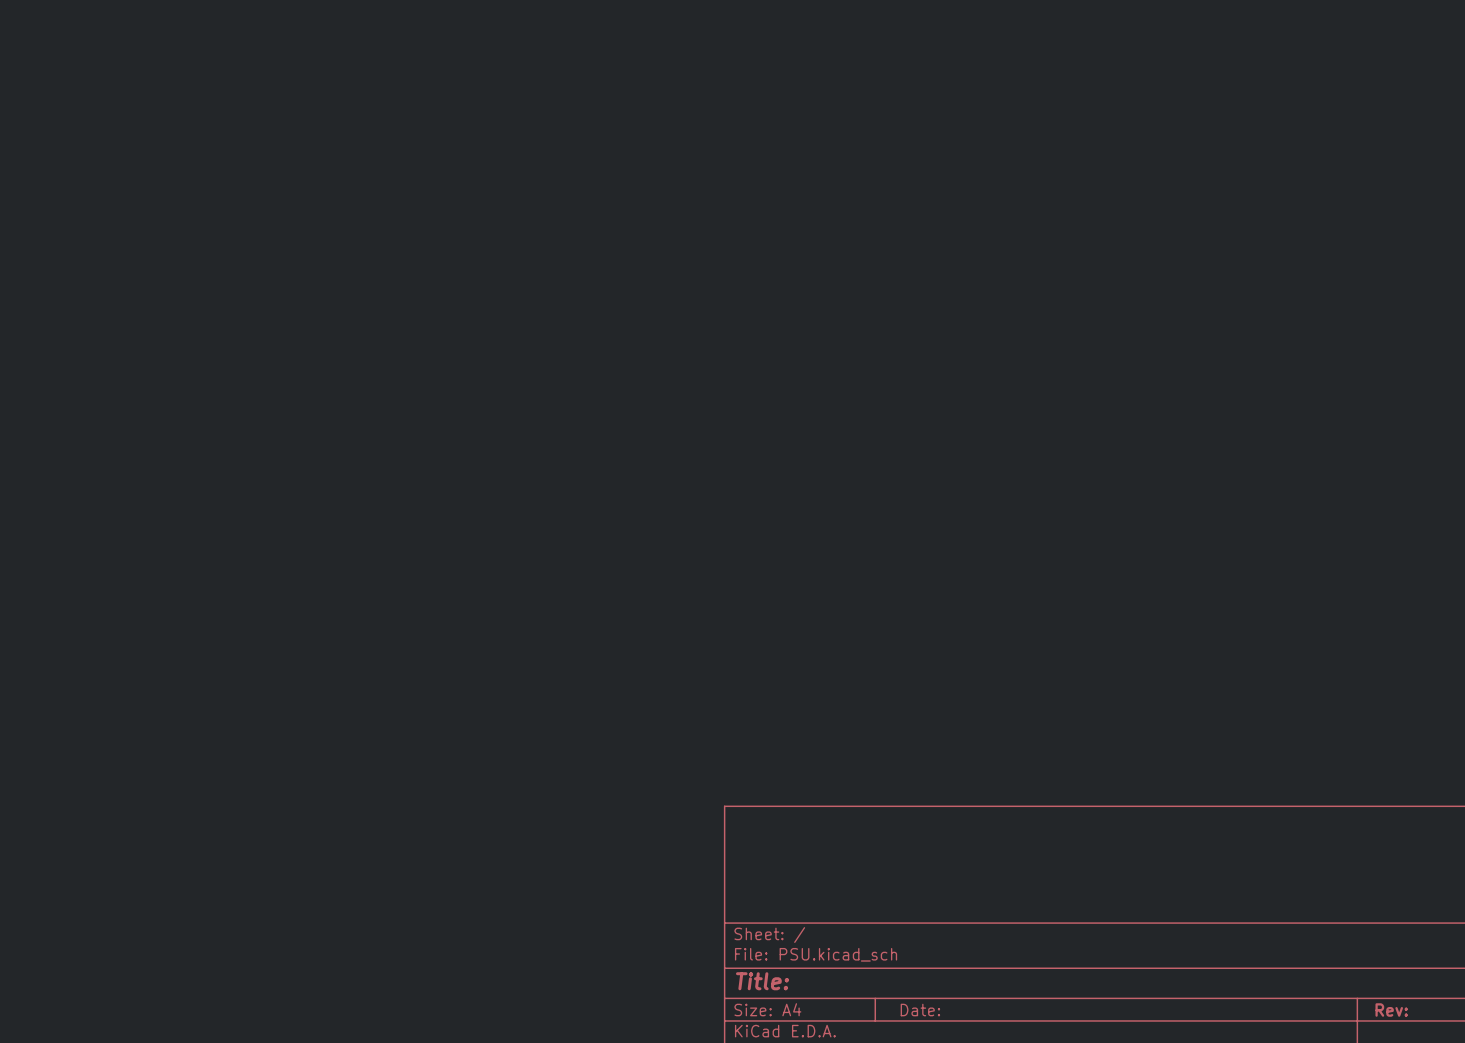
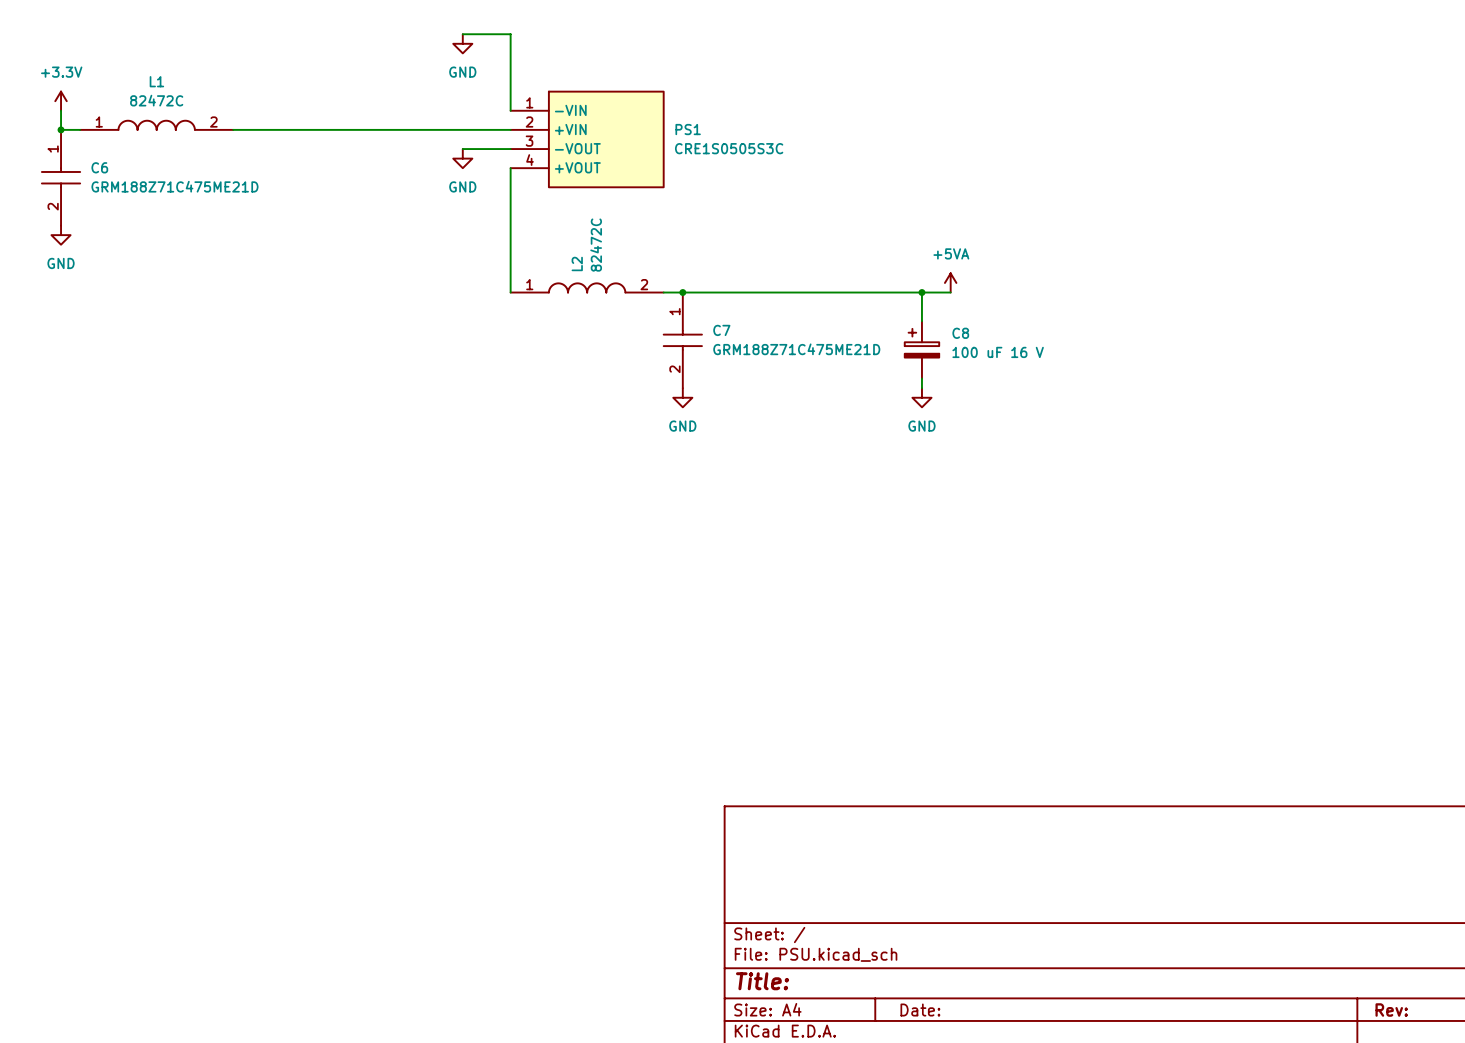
wire: none -> (462, 34) (510, 34) (510, 110)
power symbol: none -> GND (462, 43)
power symbol: none -> +3.3V (61, 101)
wire: none -> (61, 110) (61, 129) (80, 129)
L1: none -> 82472C (156, 125)
junction: none -> (61, 129)
wire: none -> (233, 129) (510, 129)
PS1: none -> CRE1S0505S3C (587, 139)
wire: none -> (462, 149) (510, 149)
power symbol: none -> GND (462, 158)
wire: none -> (510, 168) (510, 292)
C6: none -> GRM188Z71C475ME21D (61, 177)
power symbol: none -> GND (61, 235)
power symbol: none -> +5VA (950, 282)
L2: none -> 82472C (587, 287)
wire: none -> (663, 292) (950, 292)
junction: none -> (682, 292)
wire: none -> (921, 292) (921, 321)
junction: none -> (921, 292)
C7: none -> GRM188Z71C475ME21D (682, 340)
C8: none -> 100 uF 16 V (921, 349)
wire: none -> (921, 378) (921, 388)
power symbol: none -> GND (682, 397)
power symbol: none -> GND (921, 397)

